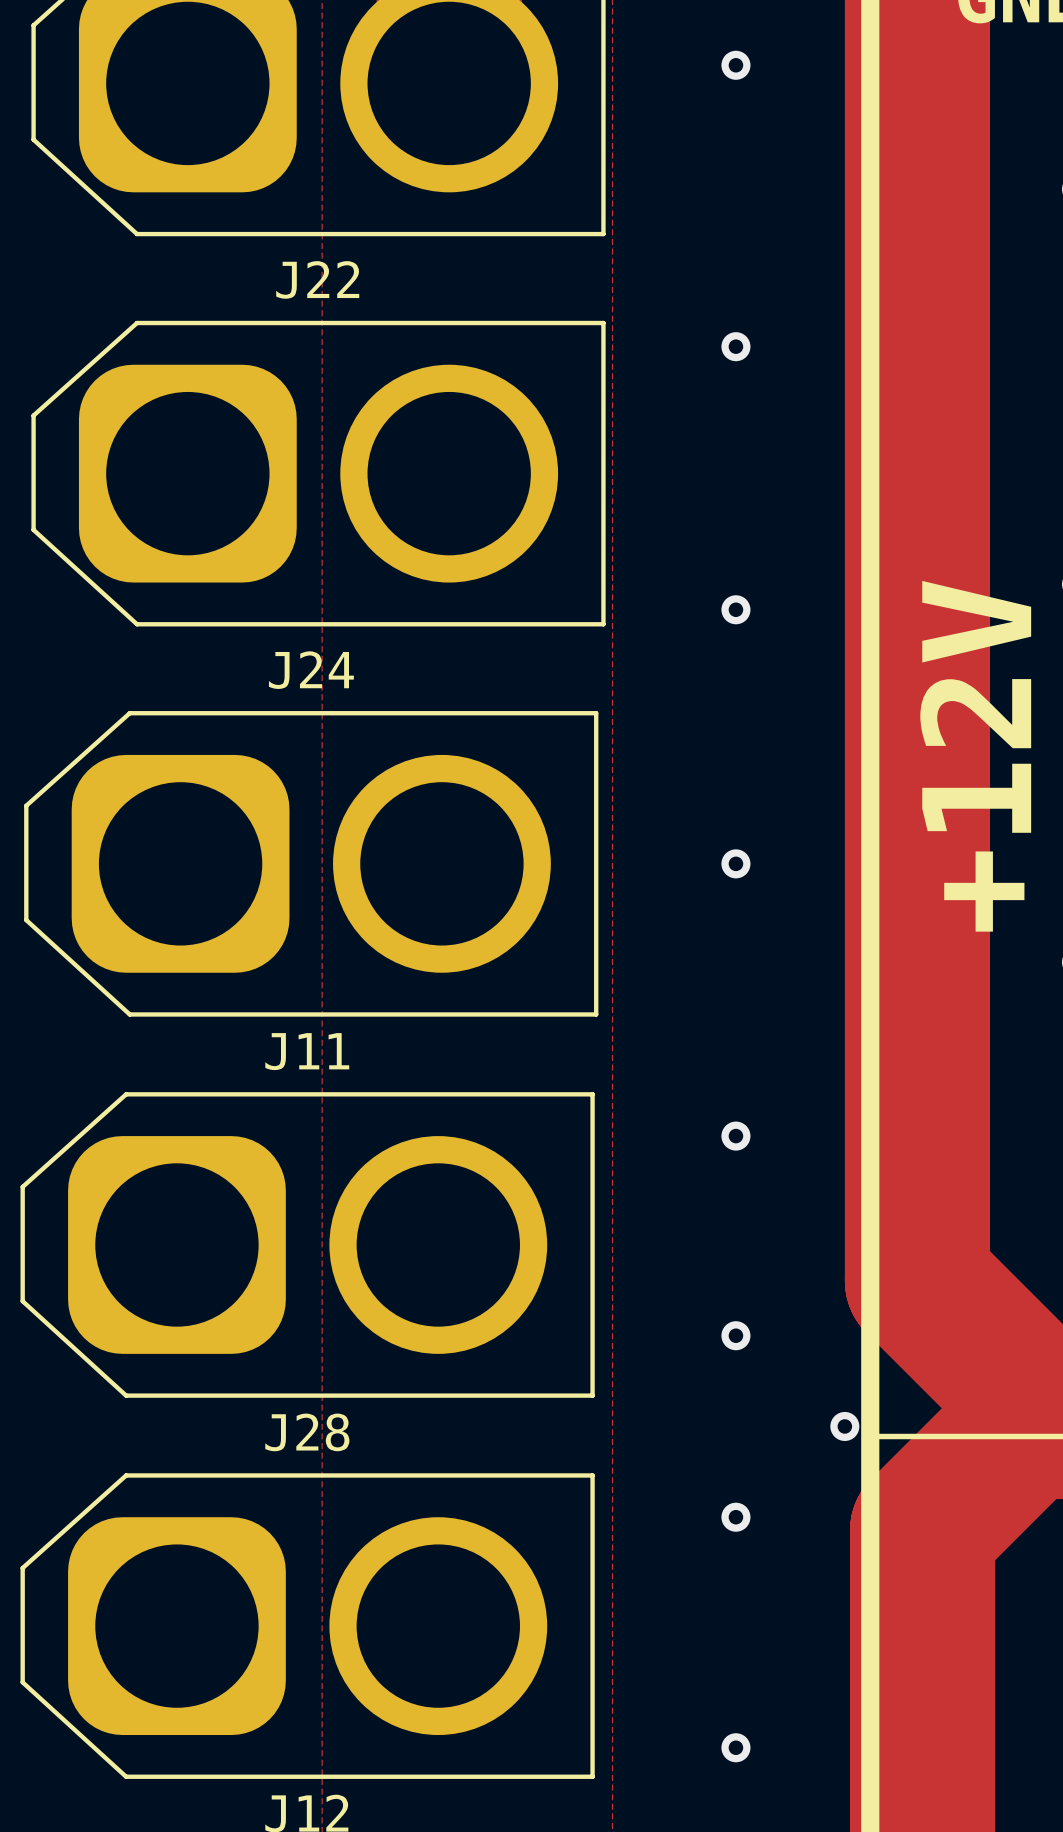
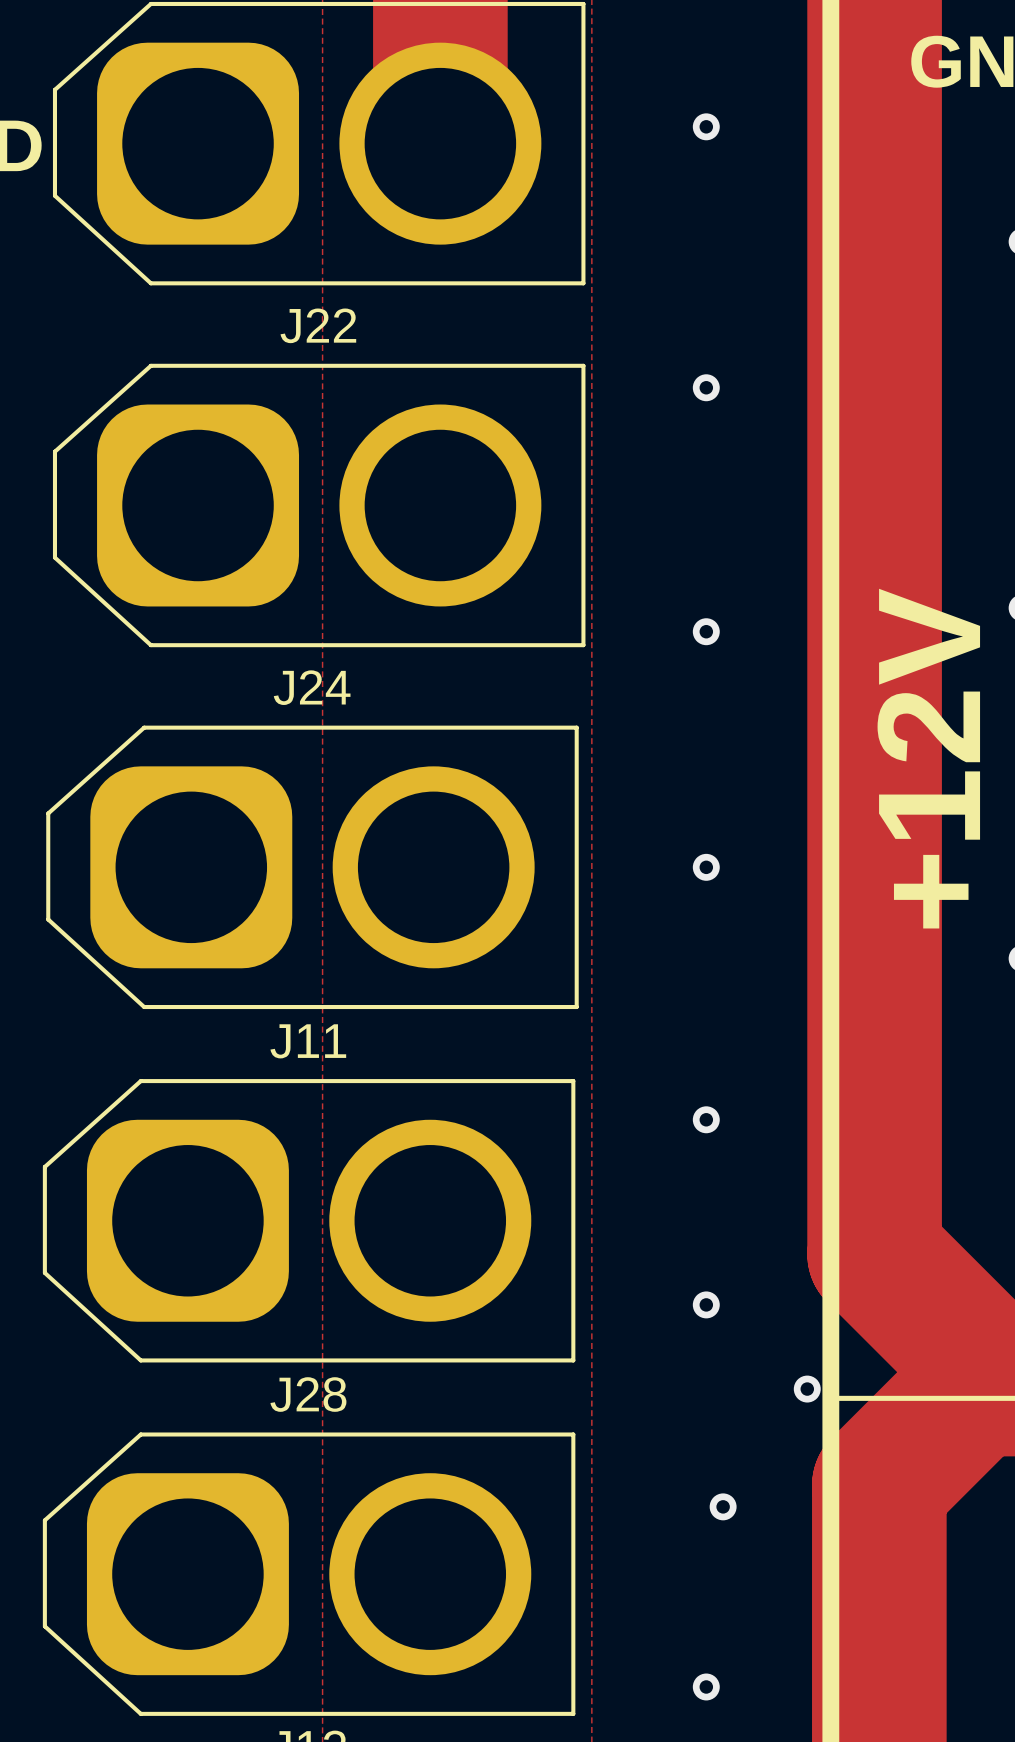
via position: (735, 1517) -> (723, 1506)

